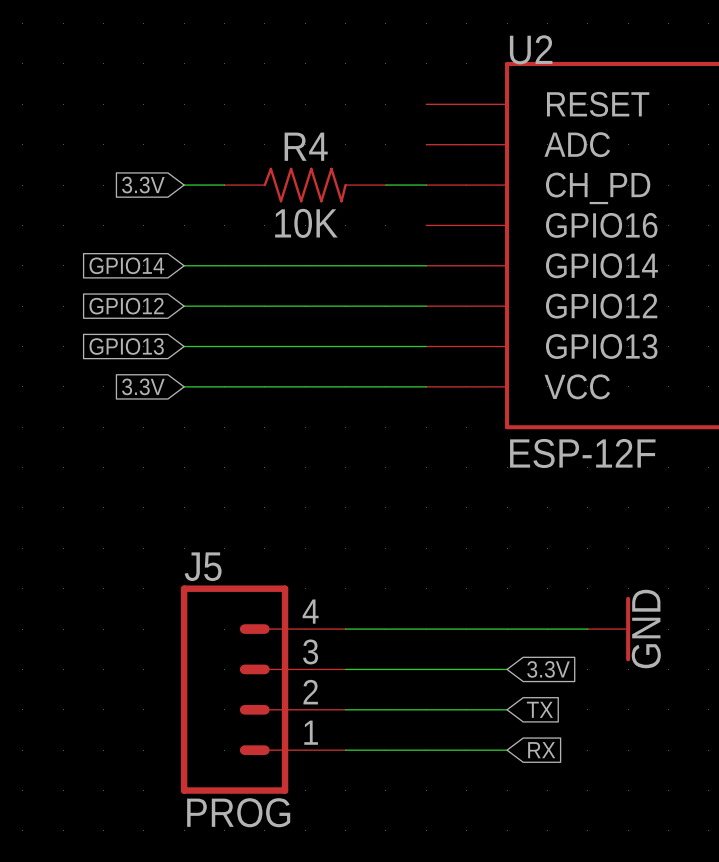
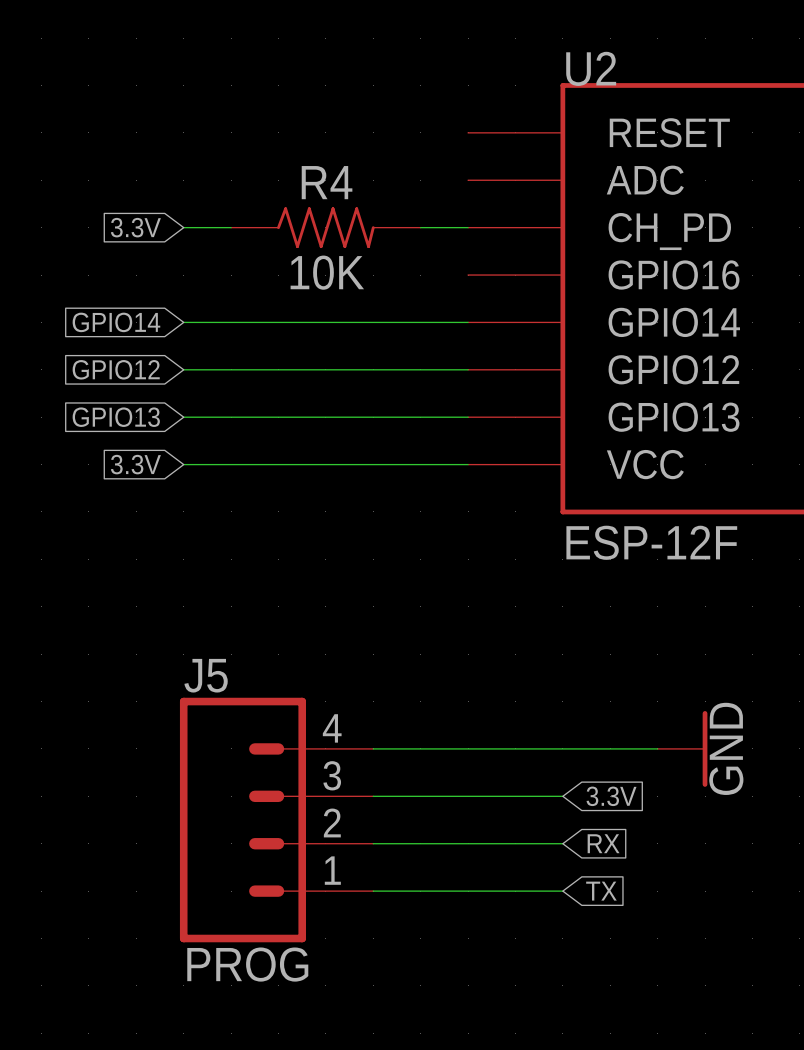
global label: TX (539, 709) -> RX (603, 843)
global label: RX (541, 750) -> TX (601, 891)

